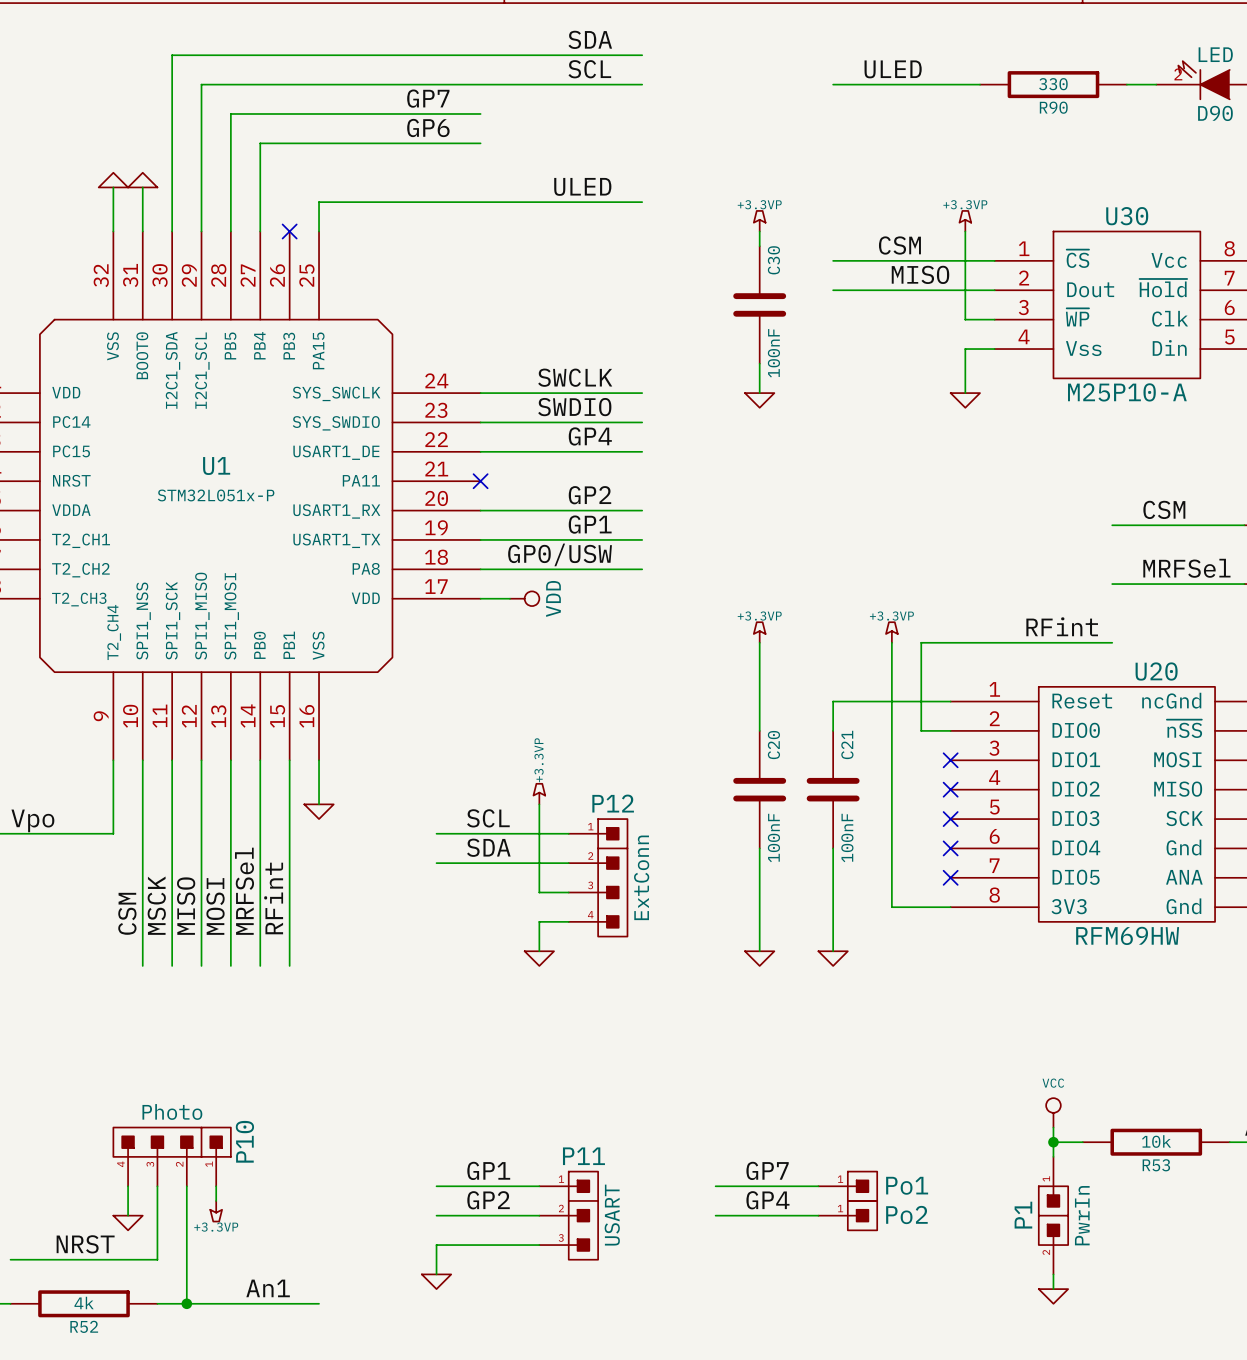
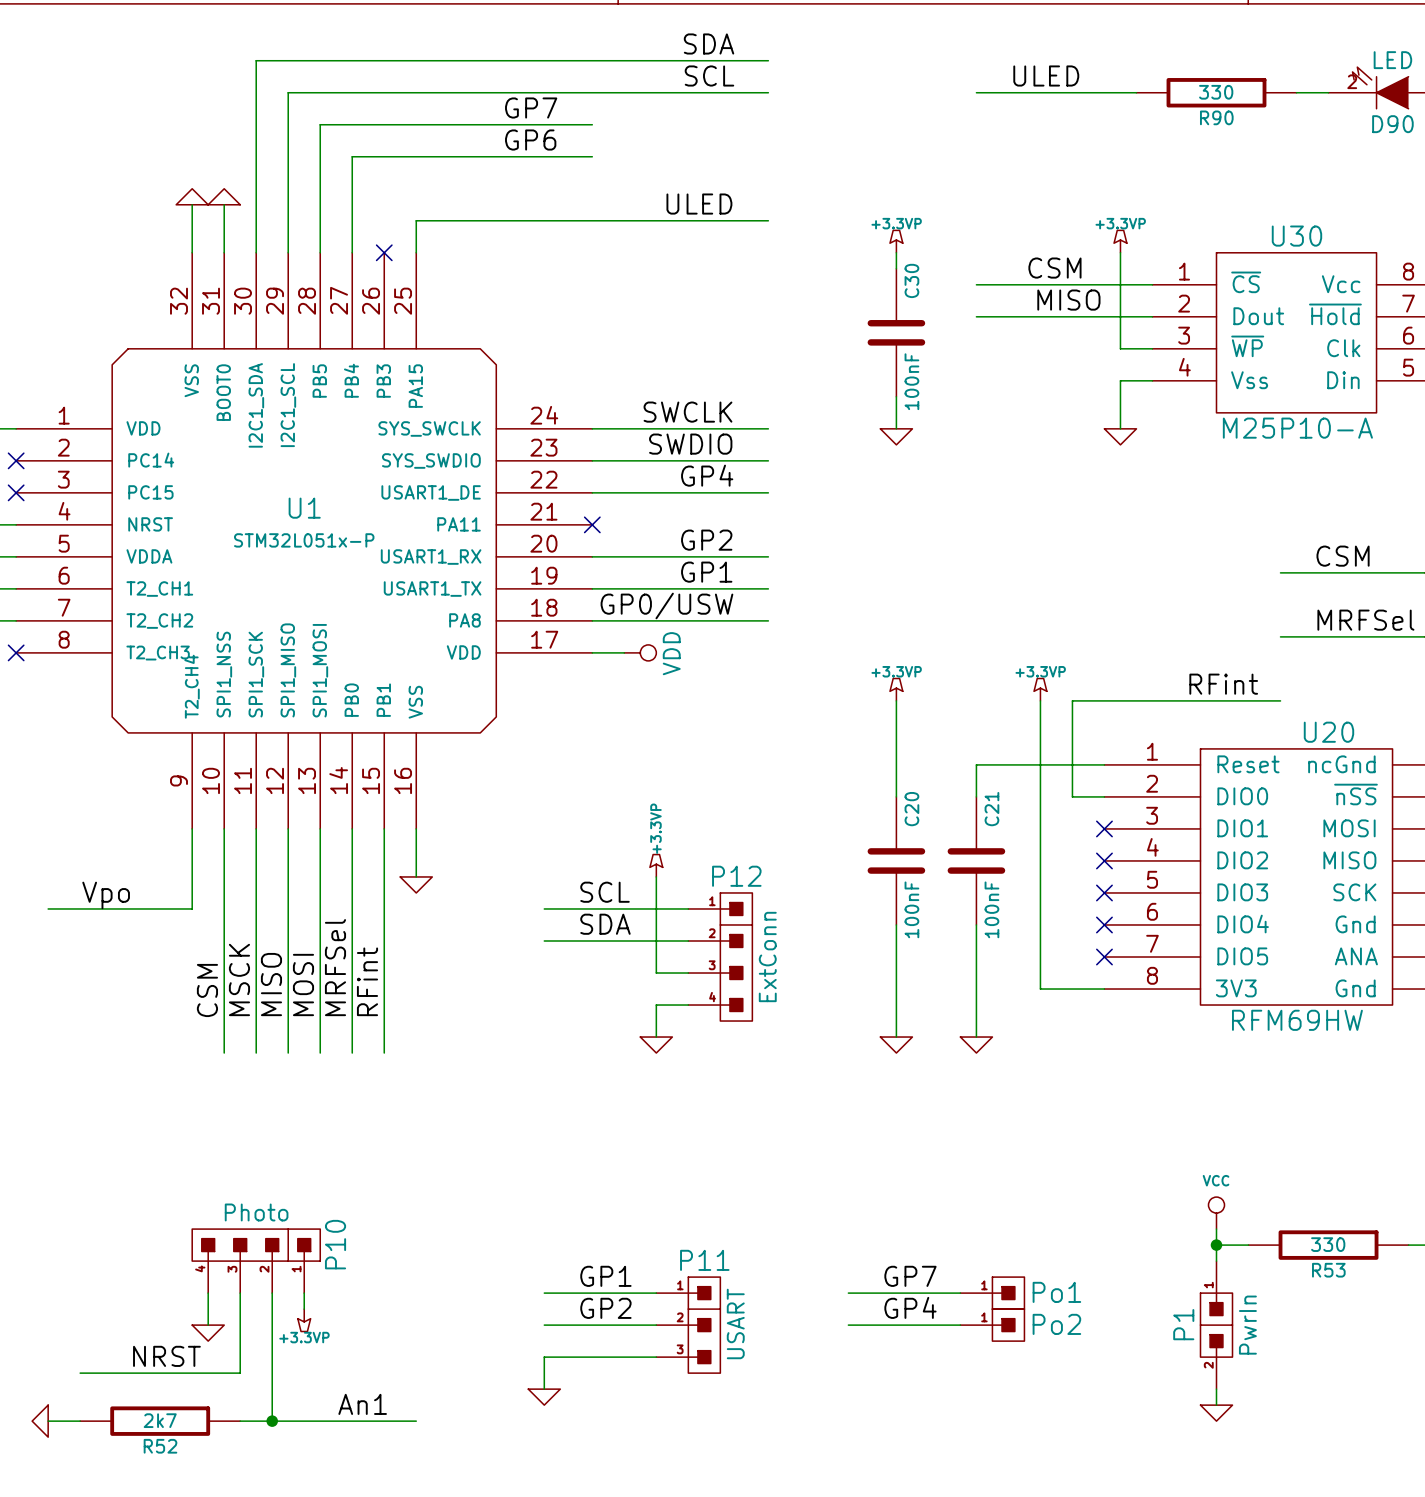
R53 value: 10k (1156, 1141) -> 330 (1328, 1244)
R52 value: 4k (84, 1303) -> 2k7 (160, 1420)

